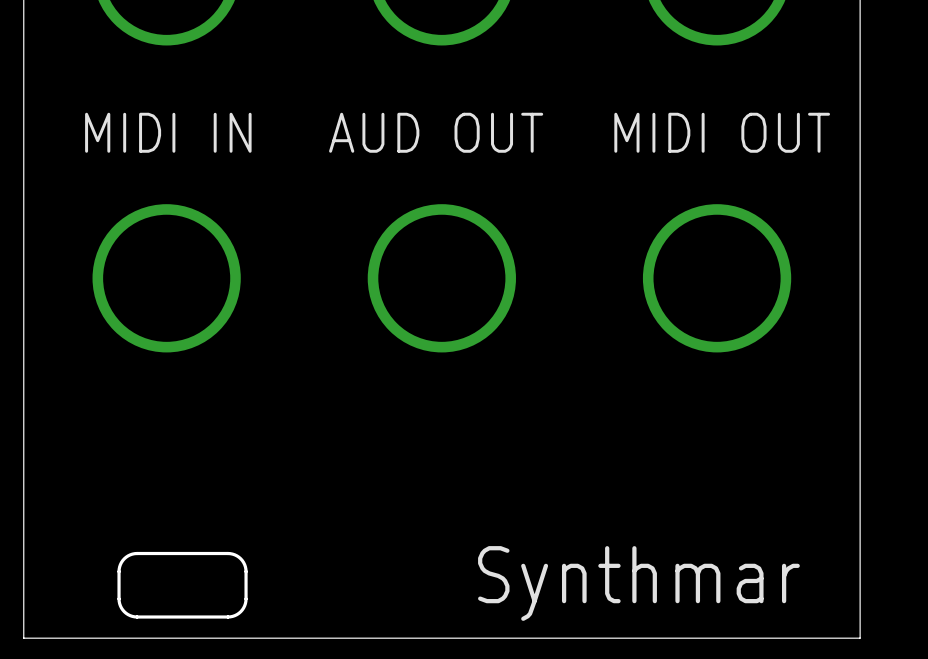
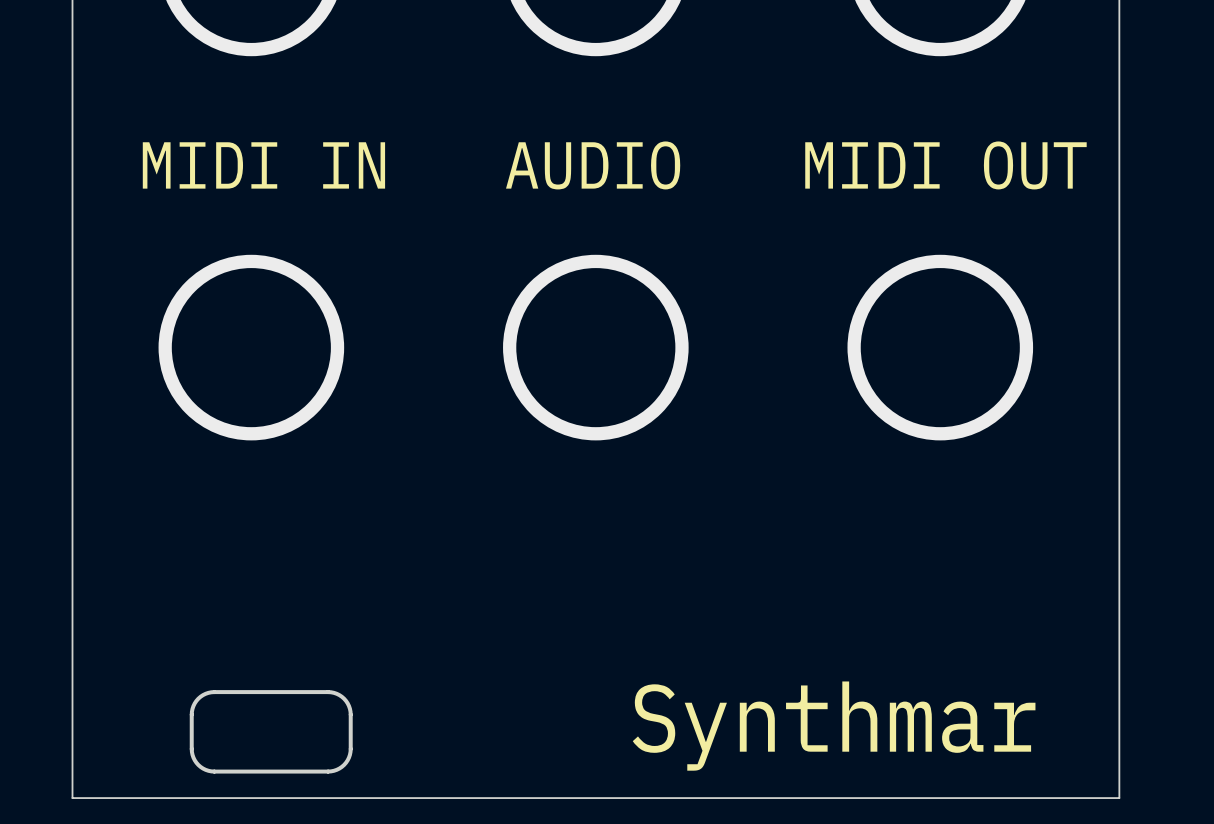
text: AUD OUT (436, 132) -> AUDIO (593, 165)

